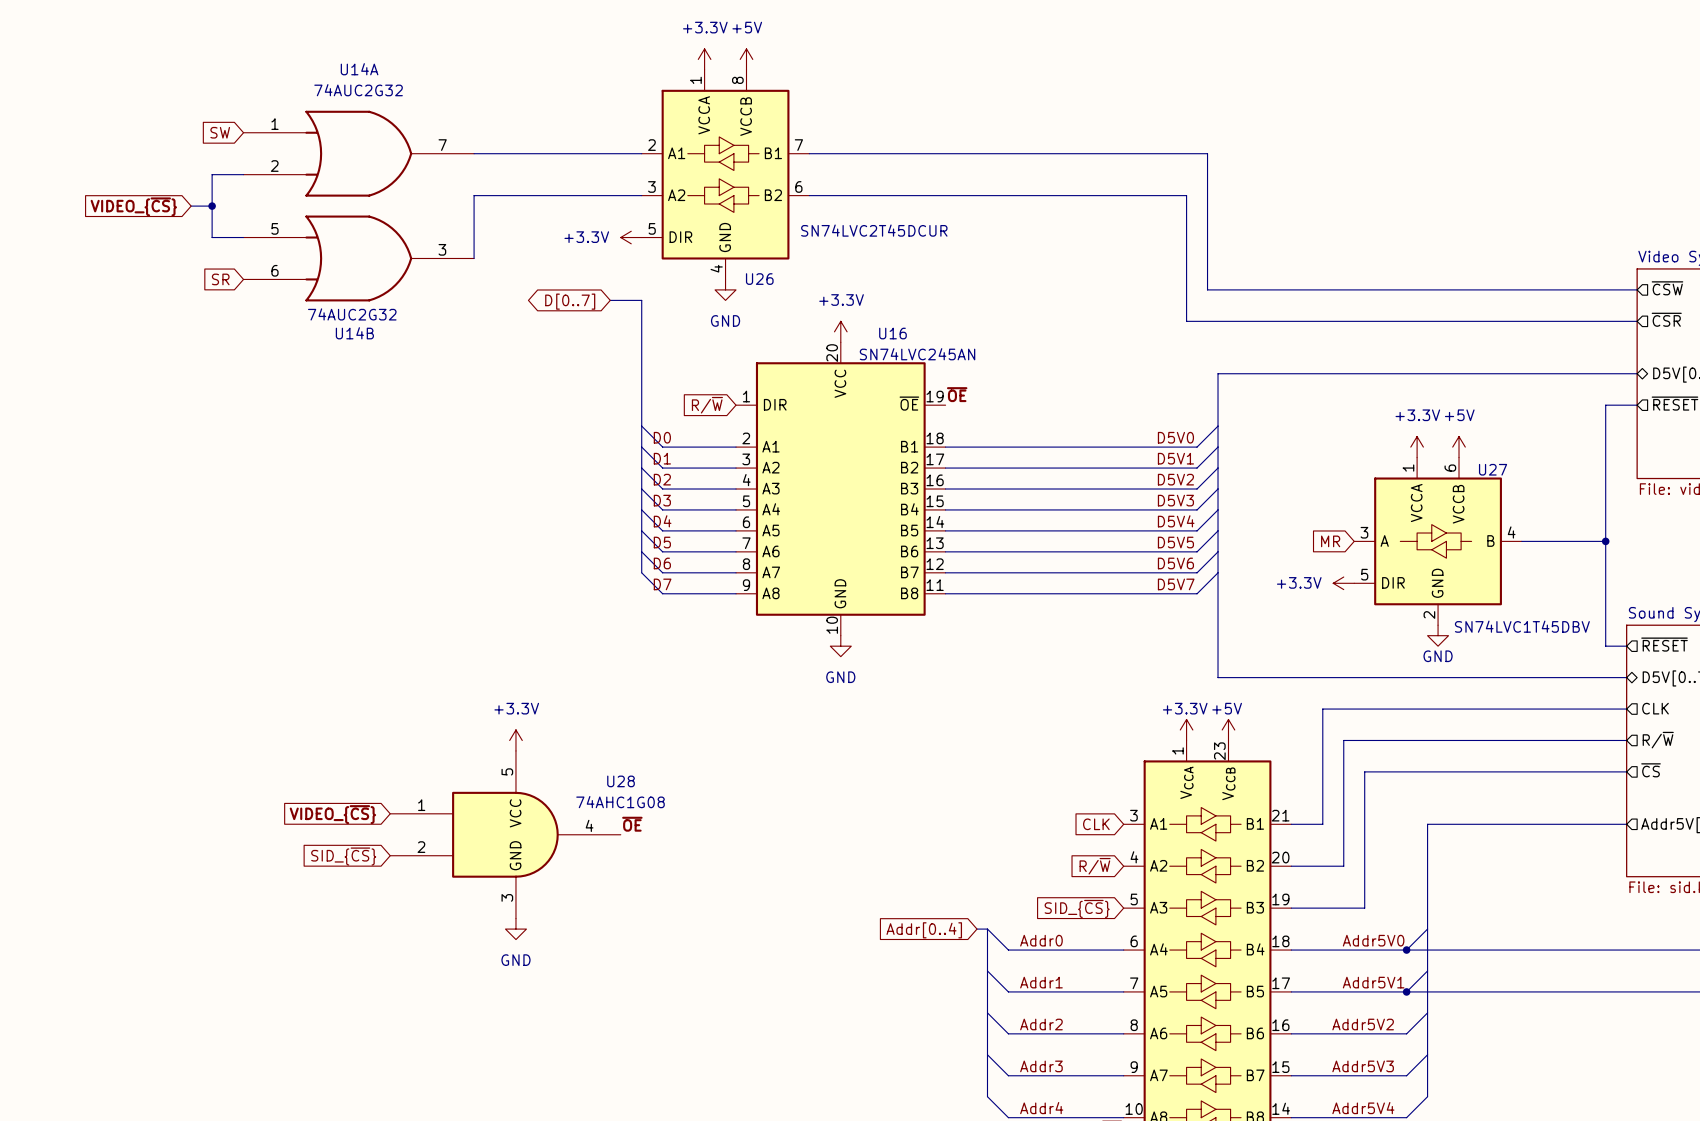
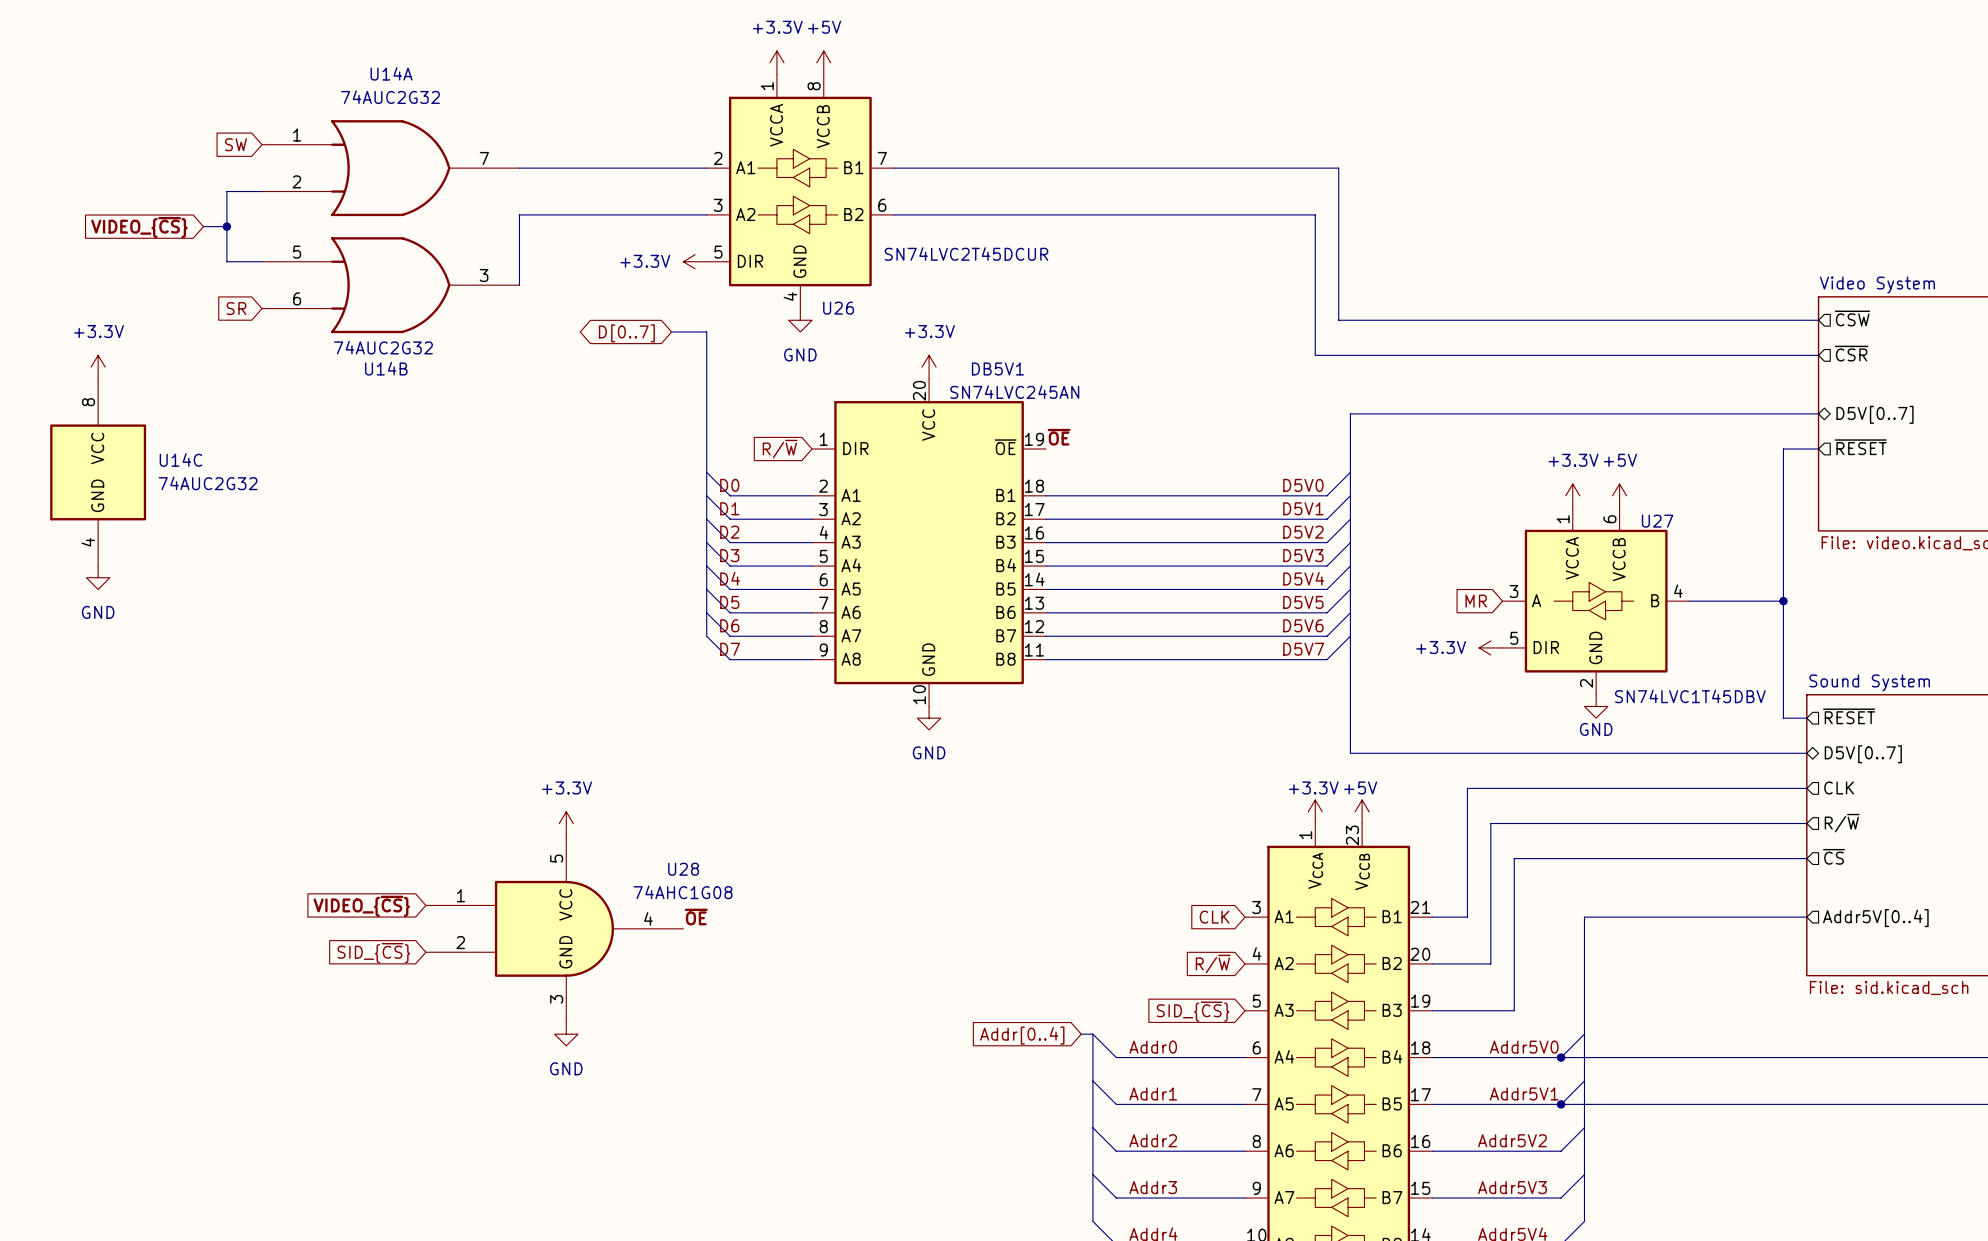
power symbol: none -> +3.3V (98, 367)
U16 name: U16 (892, 333) -> DB5V1 (997, 368)
U14C: none -> 74AUC2G32 (98, 472)
power symbol: none -> GND (98, 577)

